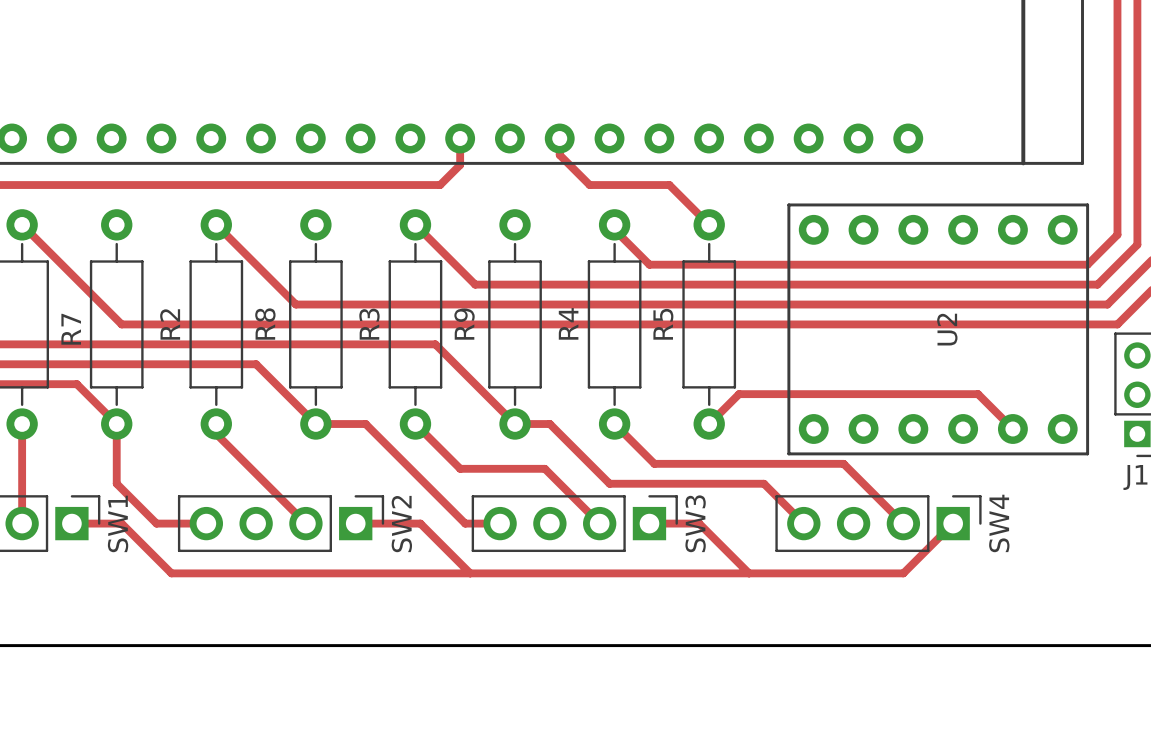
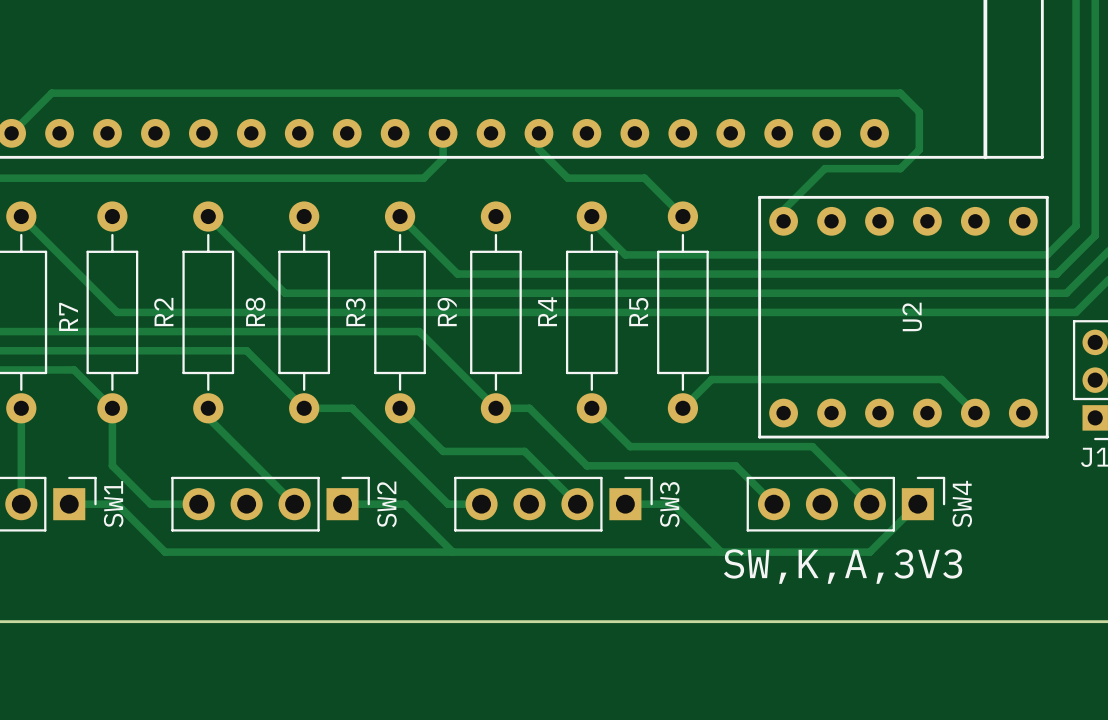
track: none -> (11, 133) (51, 93) (900, 93) (919, 112) (919, 149) (900, 168) (824, 168) (783, 209) (783, 221)
text: none -> SW,K,A,3V3 (843, 566)

